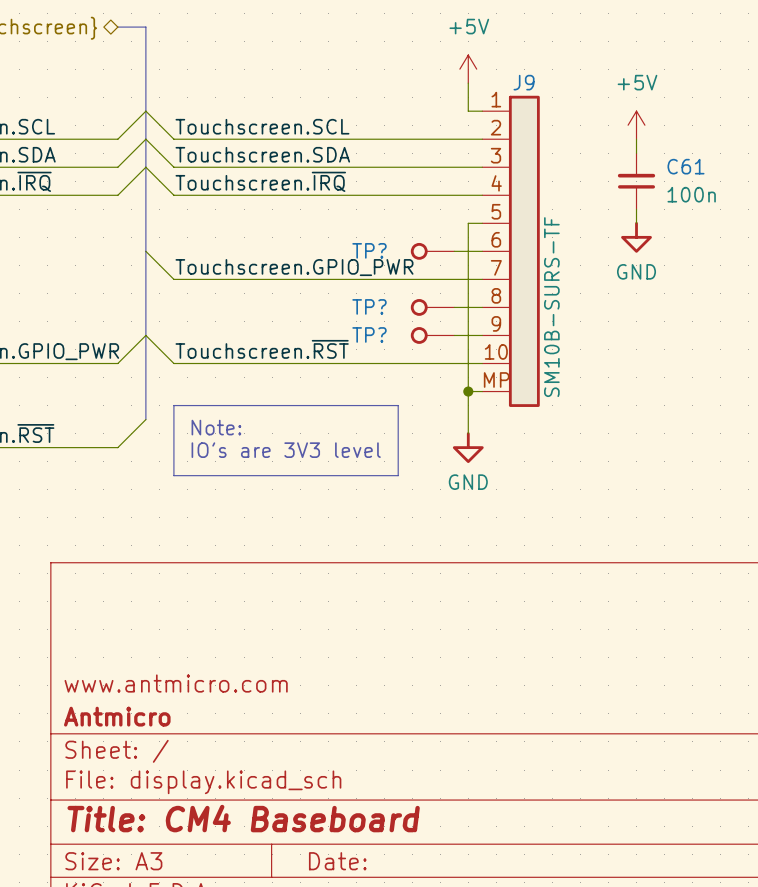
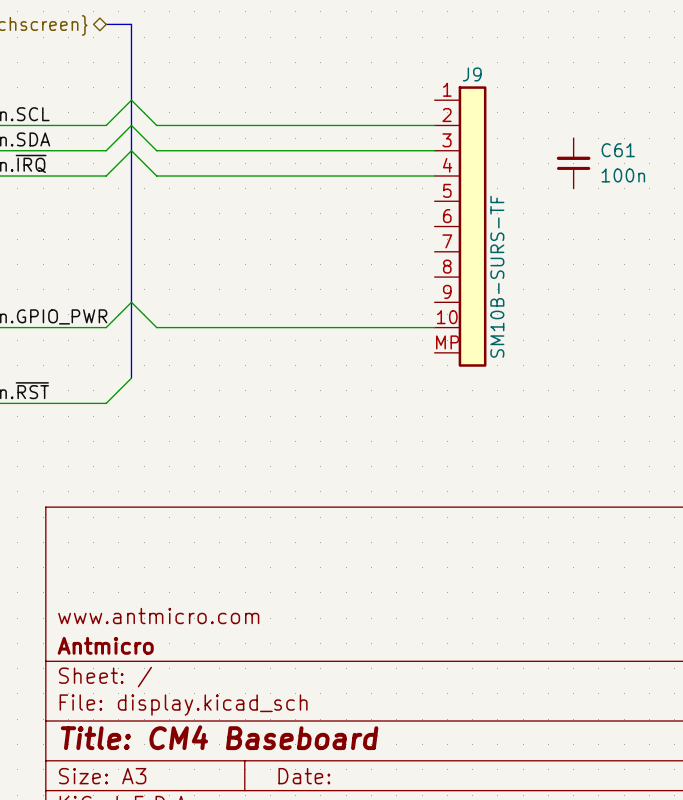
power symbol: +5V (468, 69) -> none
wire: (468, 83) (468, 111) (482, 111) -> none
power symbol: +5V (636, 125) -> none
label: Touchscreen.SCL (262, 126) -> none
wire: (636, 139) (636, 153) -> none
label: Touchscreen.SDA (262, 154) -> none
label: Touchscreen.~{IRQ} (260, 181) -> none
wire: (636, 209) (636, 223) -> none
wire: (482, 223) (468, 223) (468, 433) -> none
power symbol: GND (636, 237) -> none
wire: (145, 251) (173, 279) (482, 279) -> none
TP?: (432, 251) -> none
wire: (454, 251) (482, 251) -> none
label: Touchscreen.GPIO_PWR (294, 267) -> none
TP?: (432, 307) -> none
wire: (454, 307) (482, 307) -> none
TP?: (432, 335) -> none
wire: (454, 335) (482, 335) -> none
label: Touchscreen.~{RST} (262, 349) -> none
wire: (468, 391) (482, 391) -> none
junction: (468, 391) -> none
line: (173, 405) (173, 475) (398, 475) (398, 405) (173, 405) -> none
text: Note: (216, 427) -> none
power symbol: GND (468, 447) -> none
text: IO's are 3V3 level (286, 450) -> none

